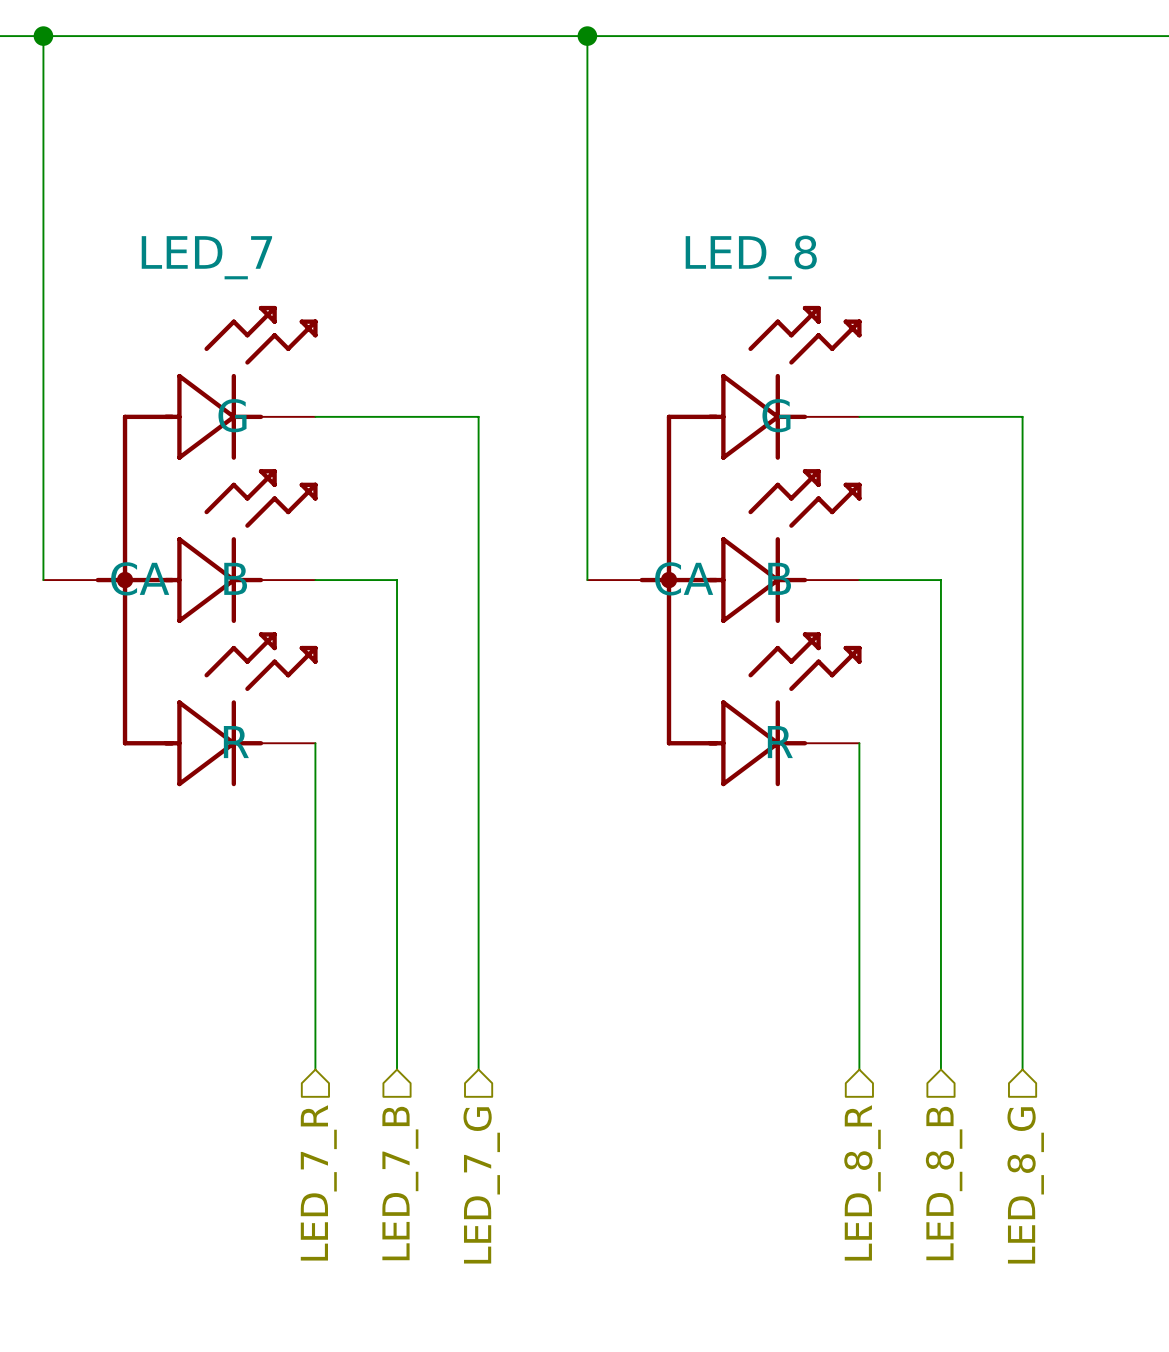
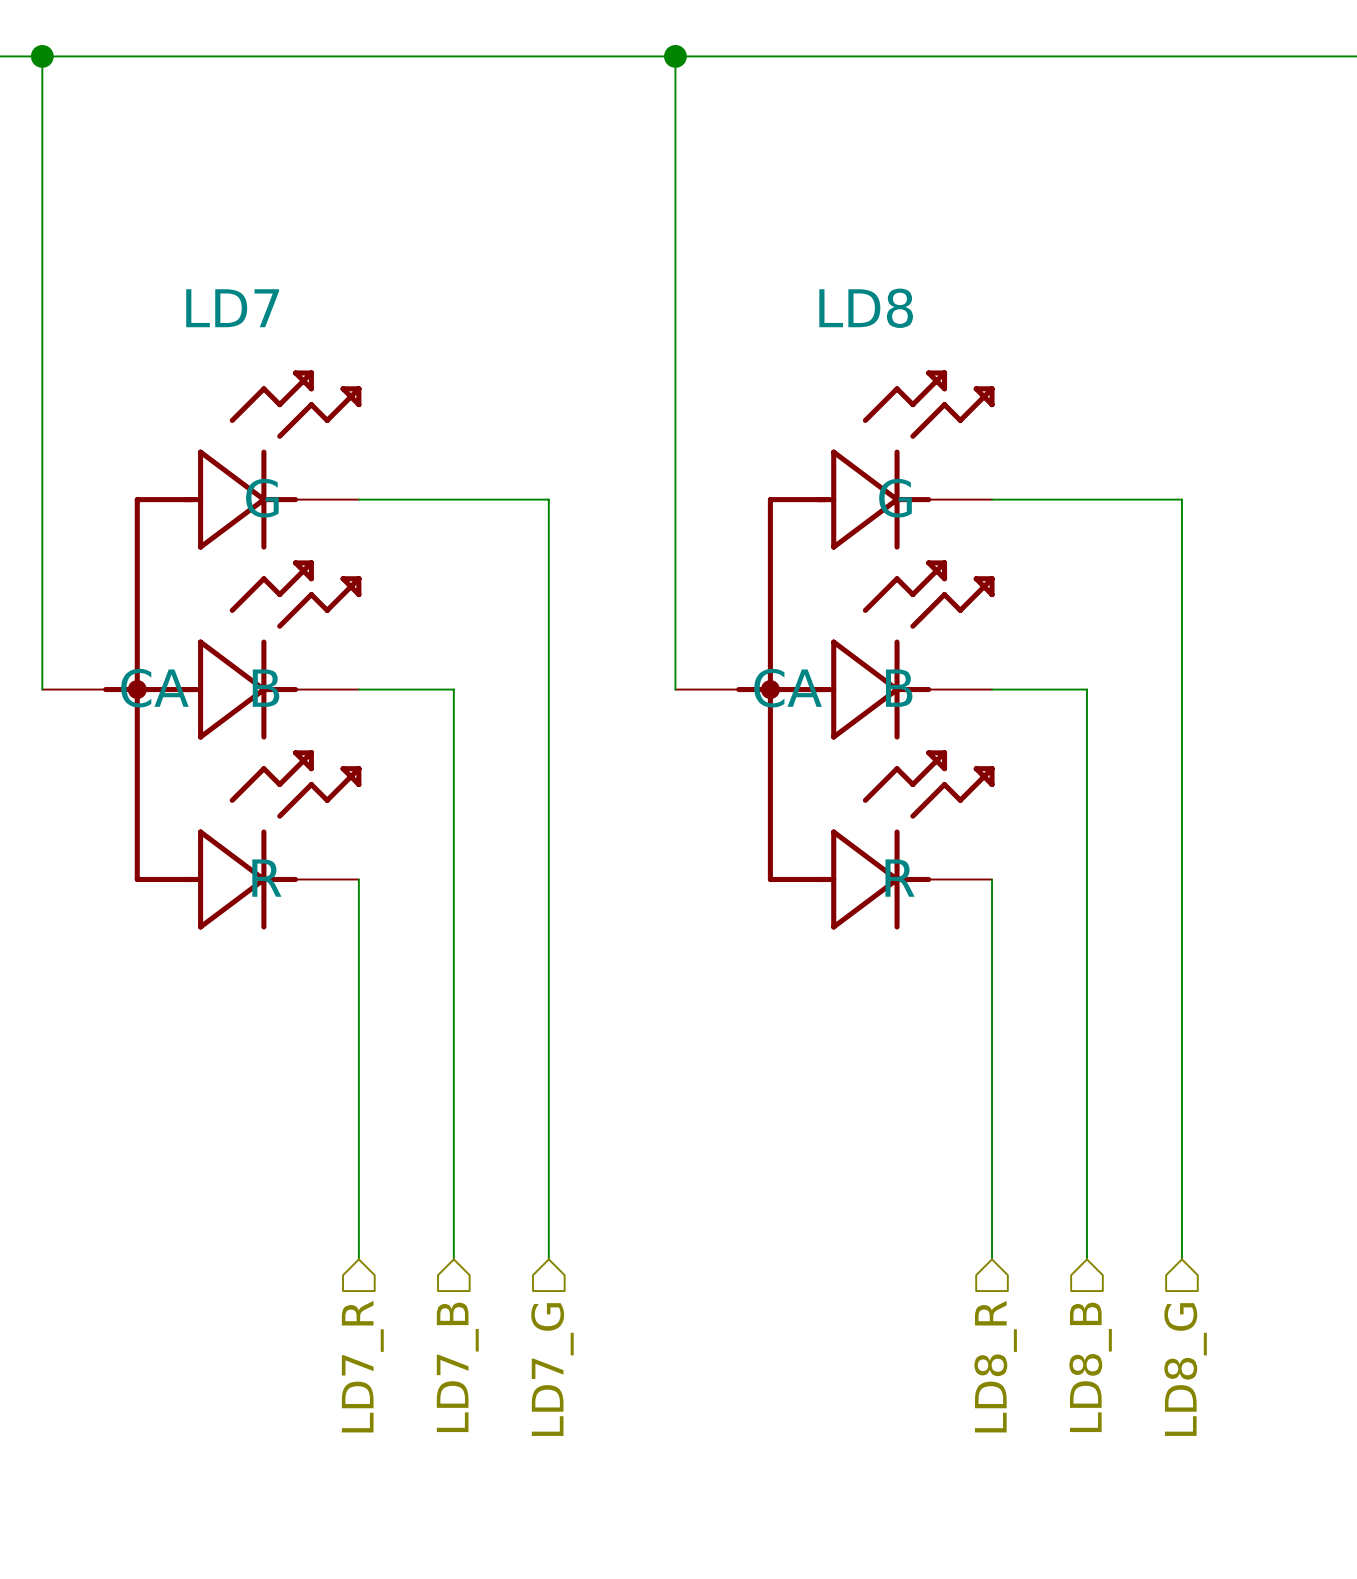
LED_7 name: LED_7 (206, 257) -> LD7 (232, 308)
LED_8 name: LED_8 (751, 257) -> LD8 (866, 308)
hierarchical label: LED_7_R (318, 1182) -> LD7_R (362, 1366)
hierarchical label: LED_8_R (862, 1182) -> LD8_R (995, 1366)
hierarchical label: LED_7_B (400, 1183) -> LD7_B (457, 1367)
hierarchical label: LED_8_B (944, 1183) -> LD8_B (1090, 1367)
hierarchical label: LED_7_G (481, 1185) -> LD7_G (552, 1369)
hierarchical label: LED_8_G (1025, 1185) -> LD8_G (1185, 1369)

